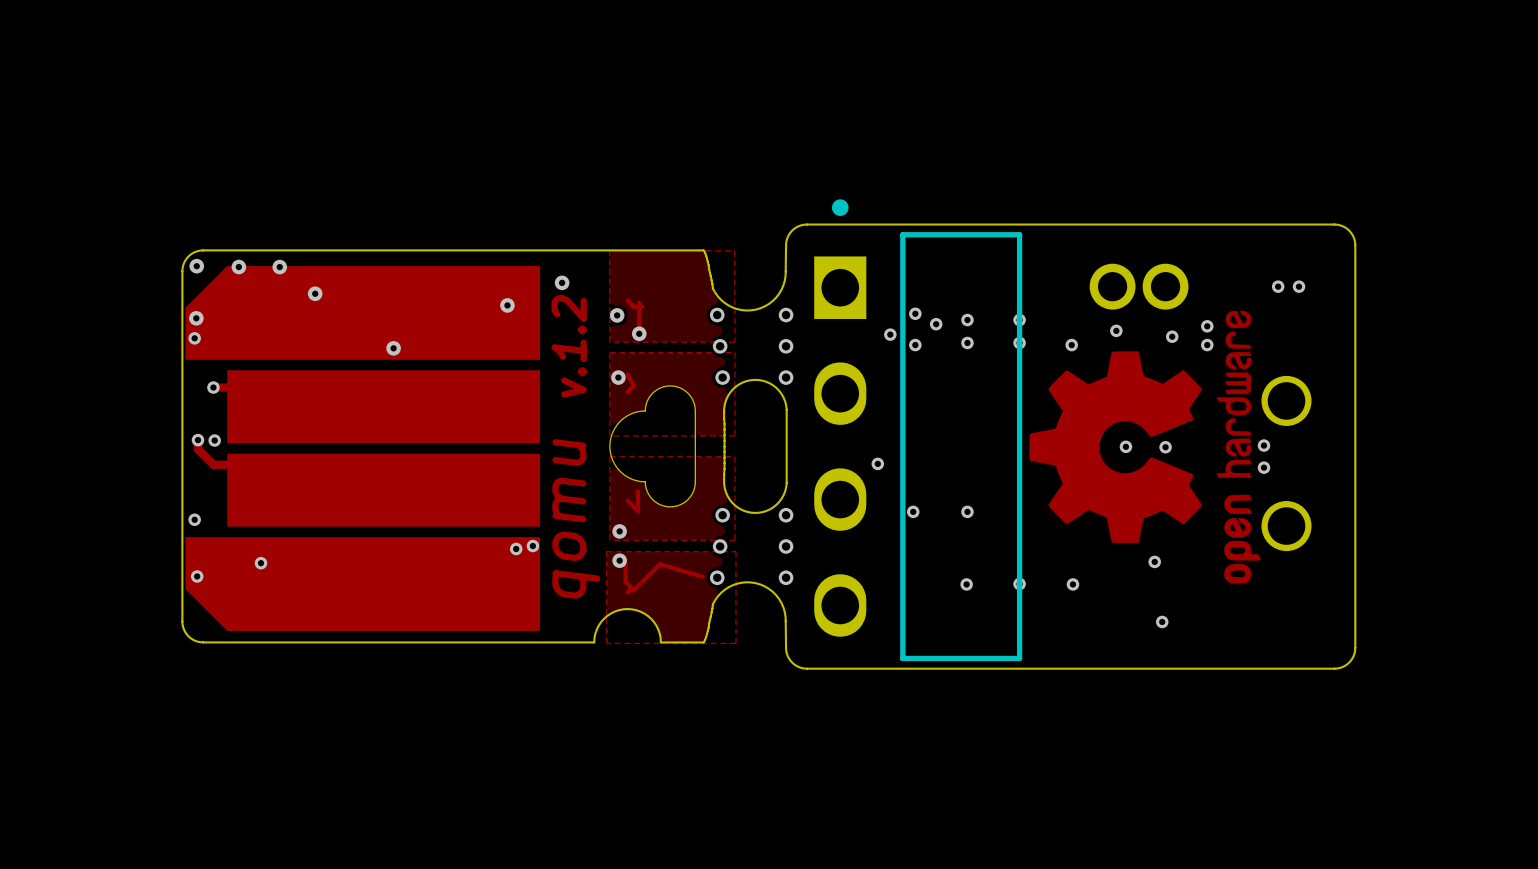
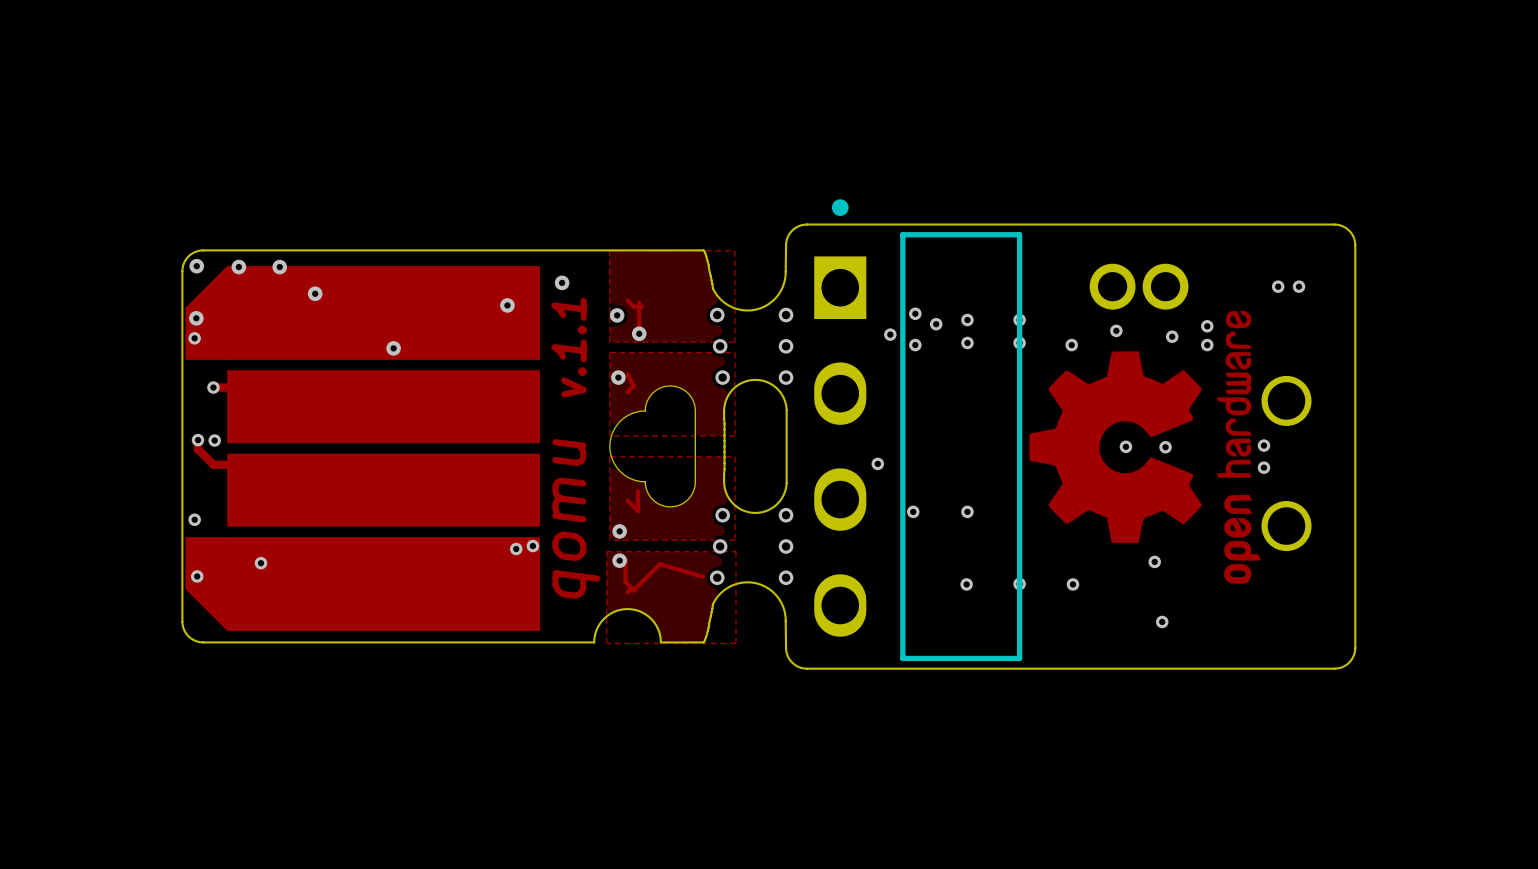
text: v.1.2 (569, 346) -> v.1.1 (569, 347)

